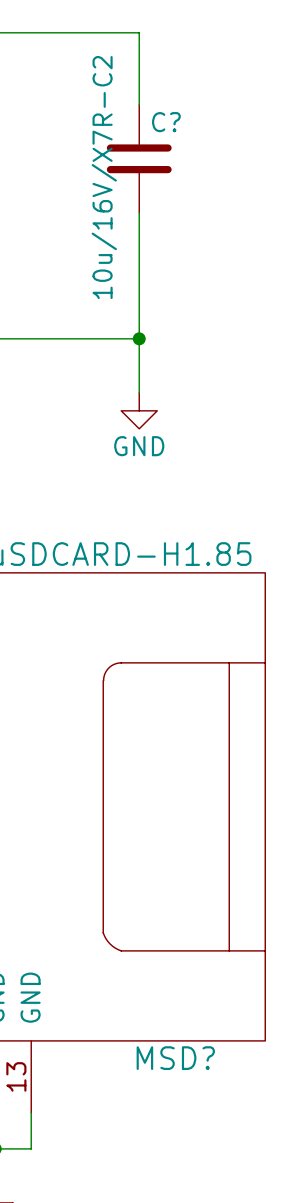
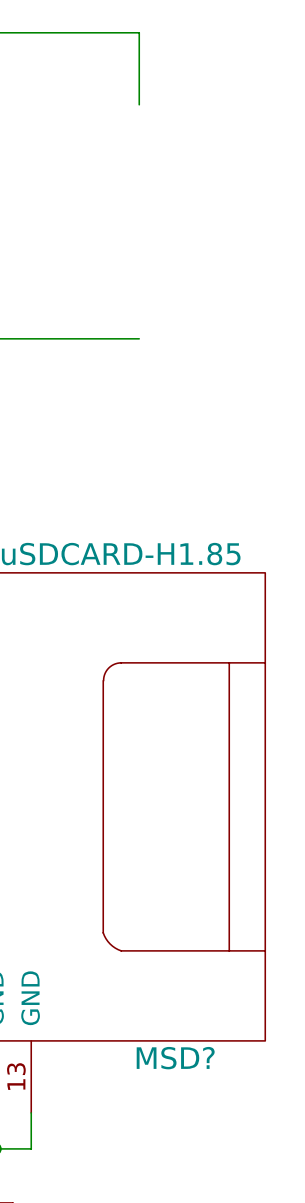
C?: 10u/16V/X7R-C2 (139, 158) -> none
wire: (139, 212) (139, 392) -> none
junction: (139, 338) -> none
power symbol: GND (139, 410) -> none

